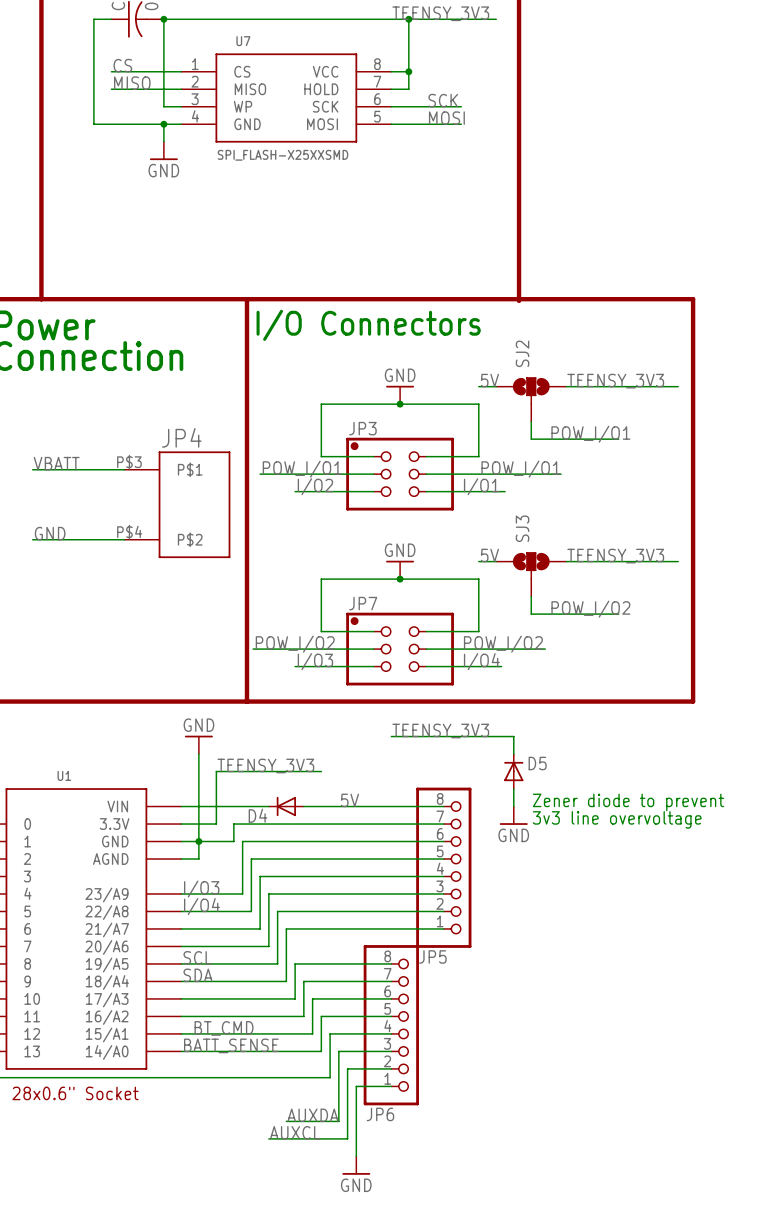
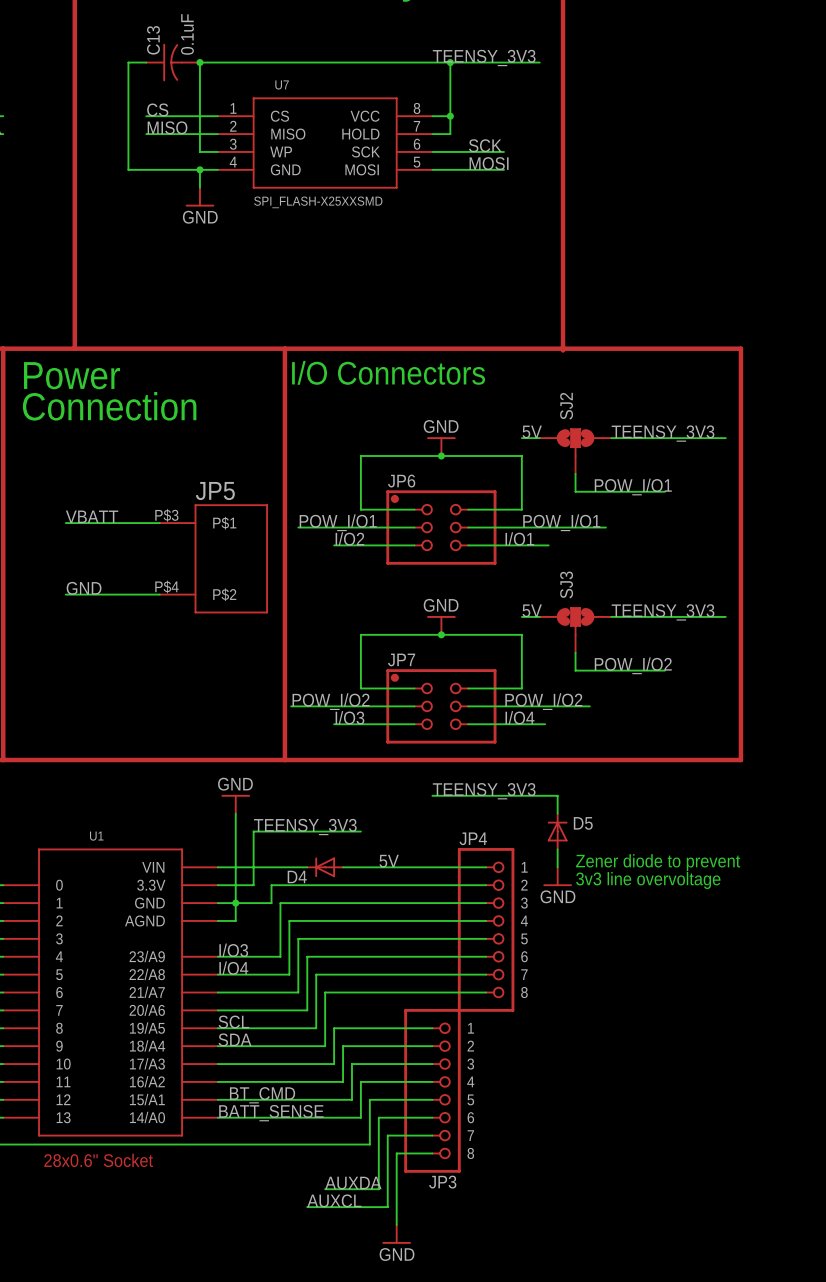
JP3 name: JP3 (362, 428) -> JP6 (401, 481)
JP4 name: JP4 (181, 437) -> JP5 (215, 491)
JP5 symbol: [416, 787, 472, 948] -> [457, 848, 515, 1012]
JP6 symbol: [363, 945, 419, 1106] -> [404, 1008, 461, 1173]
JP5 name: JP5 (432, 956) -> JP4 (473, 838)
JP6 name: JP6 (380, 1114) -> JP3 (442, 1182)

